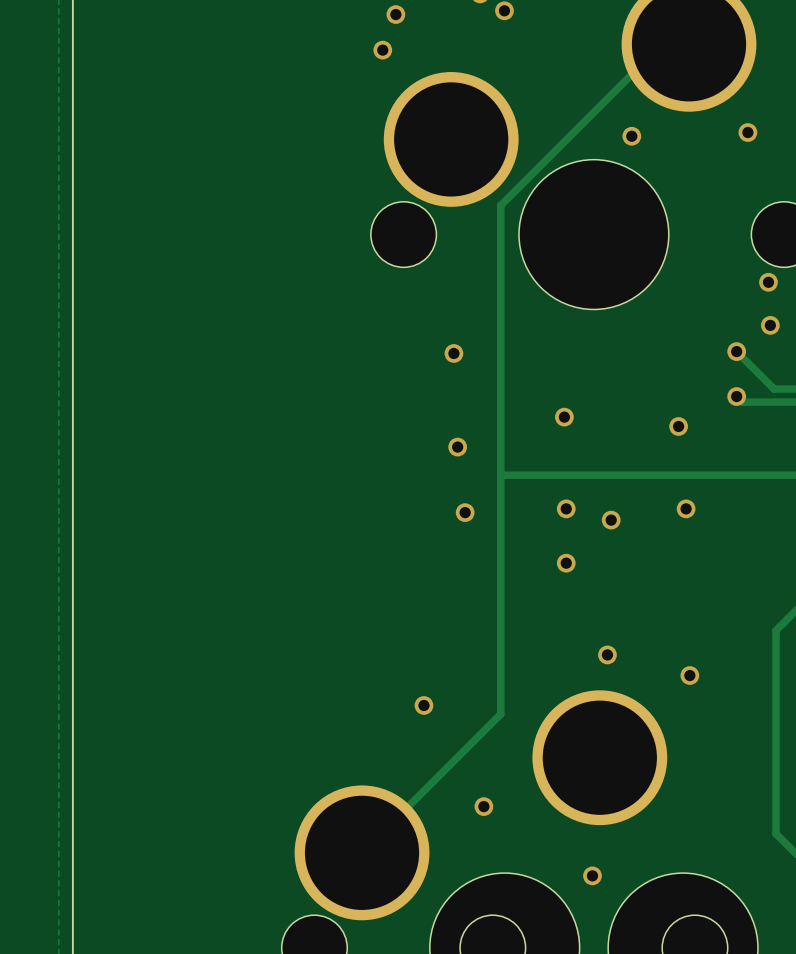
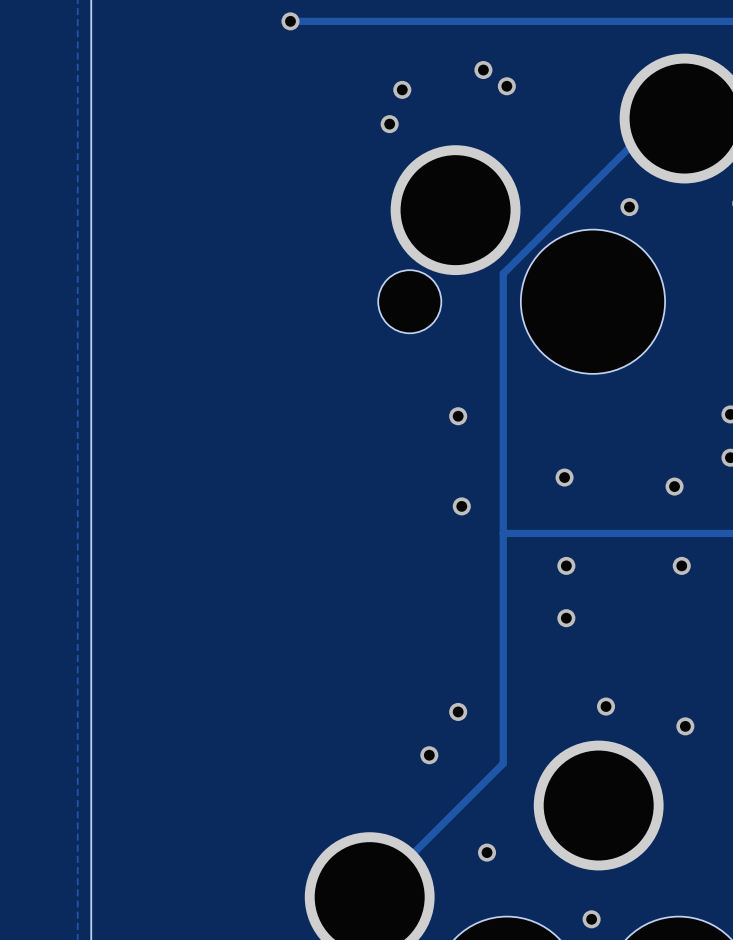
via: (465, 512) -> none
via: (611, 520) -> none
via: none -> (458, 711)

